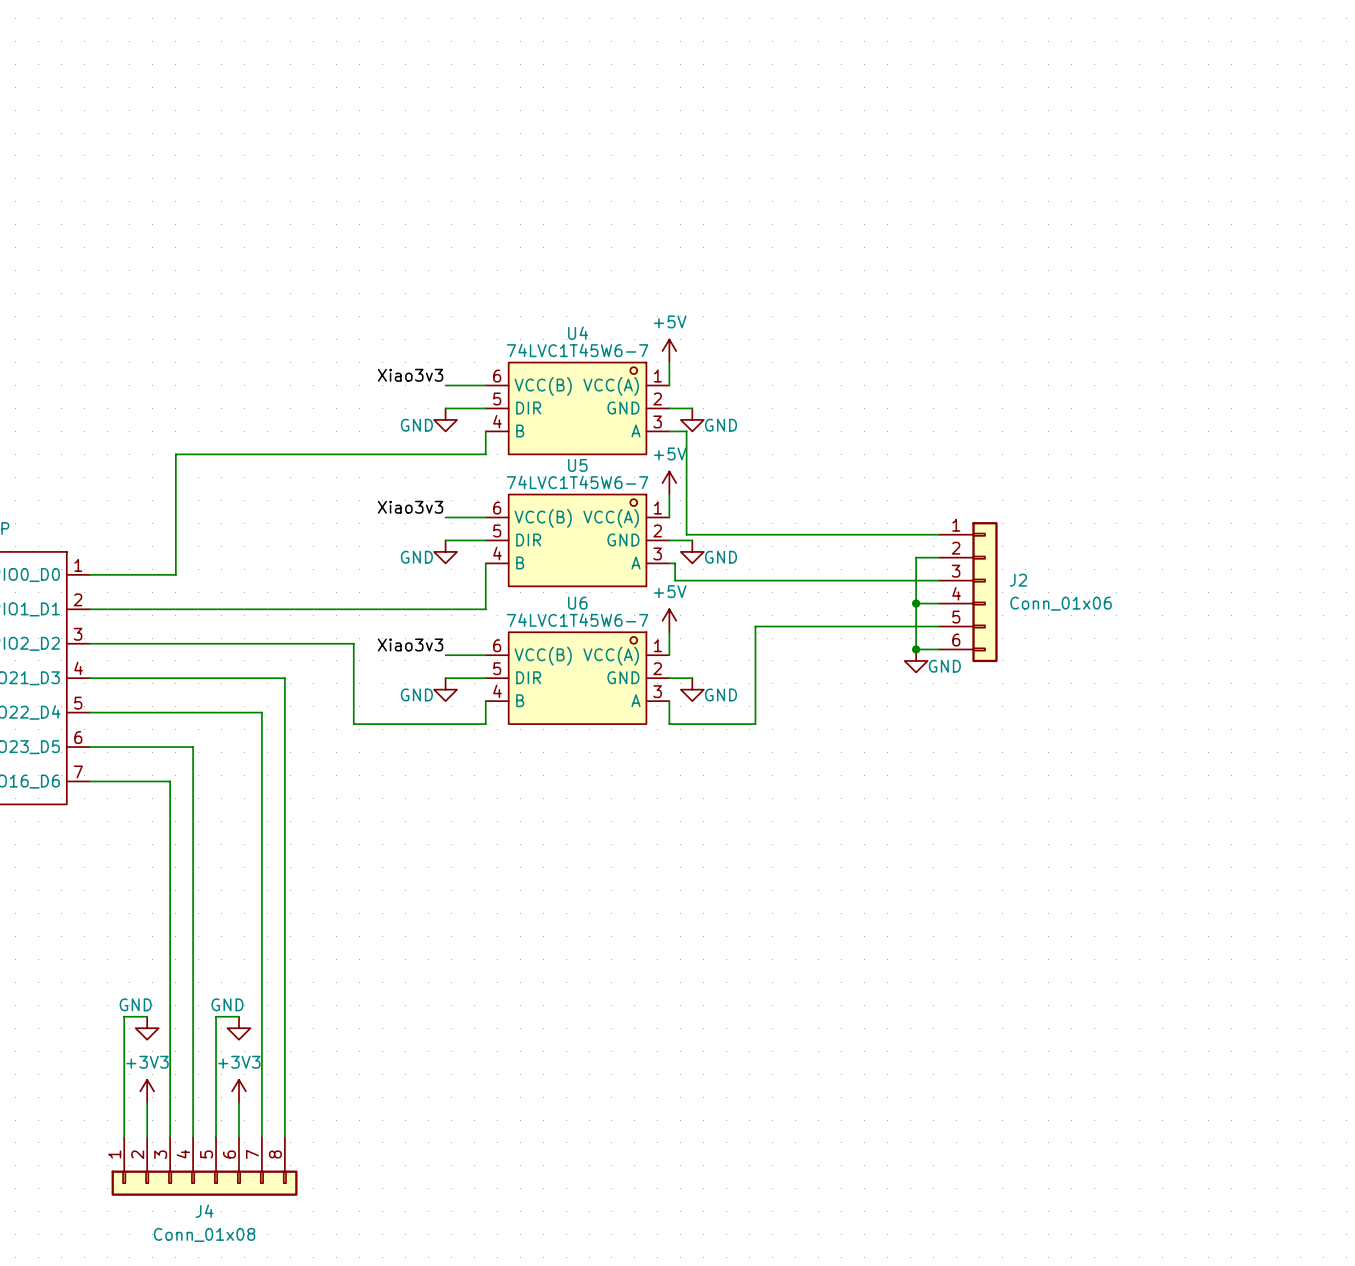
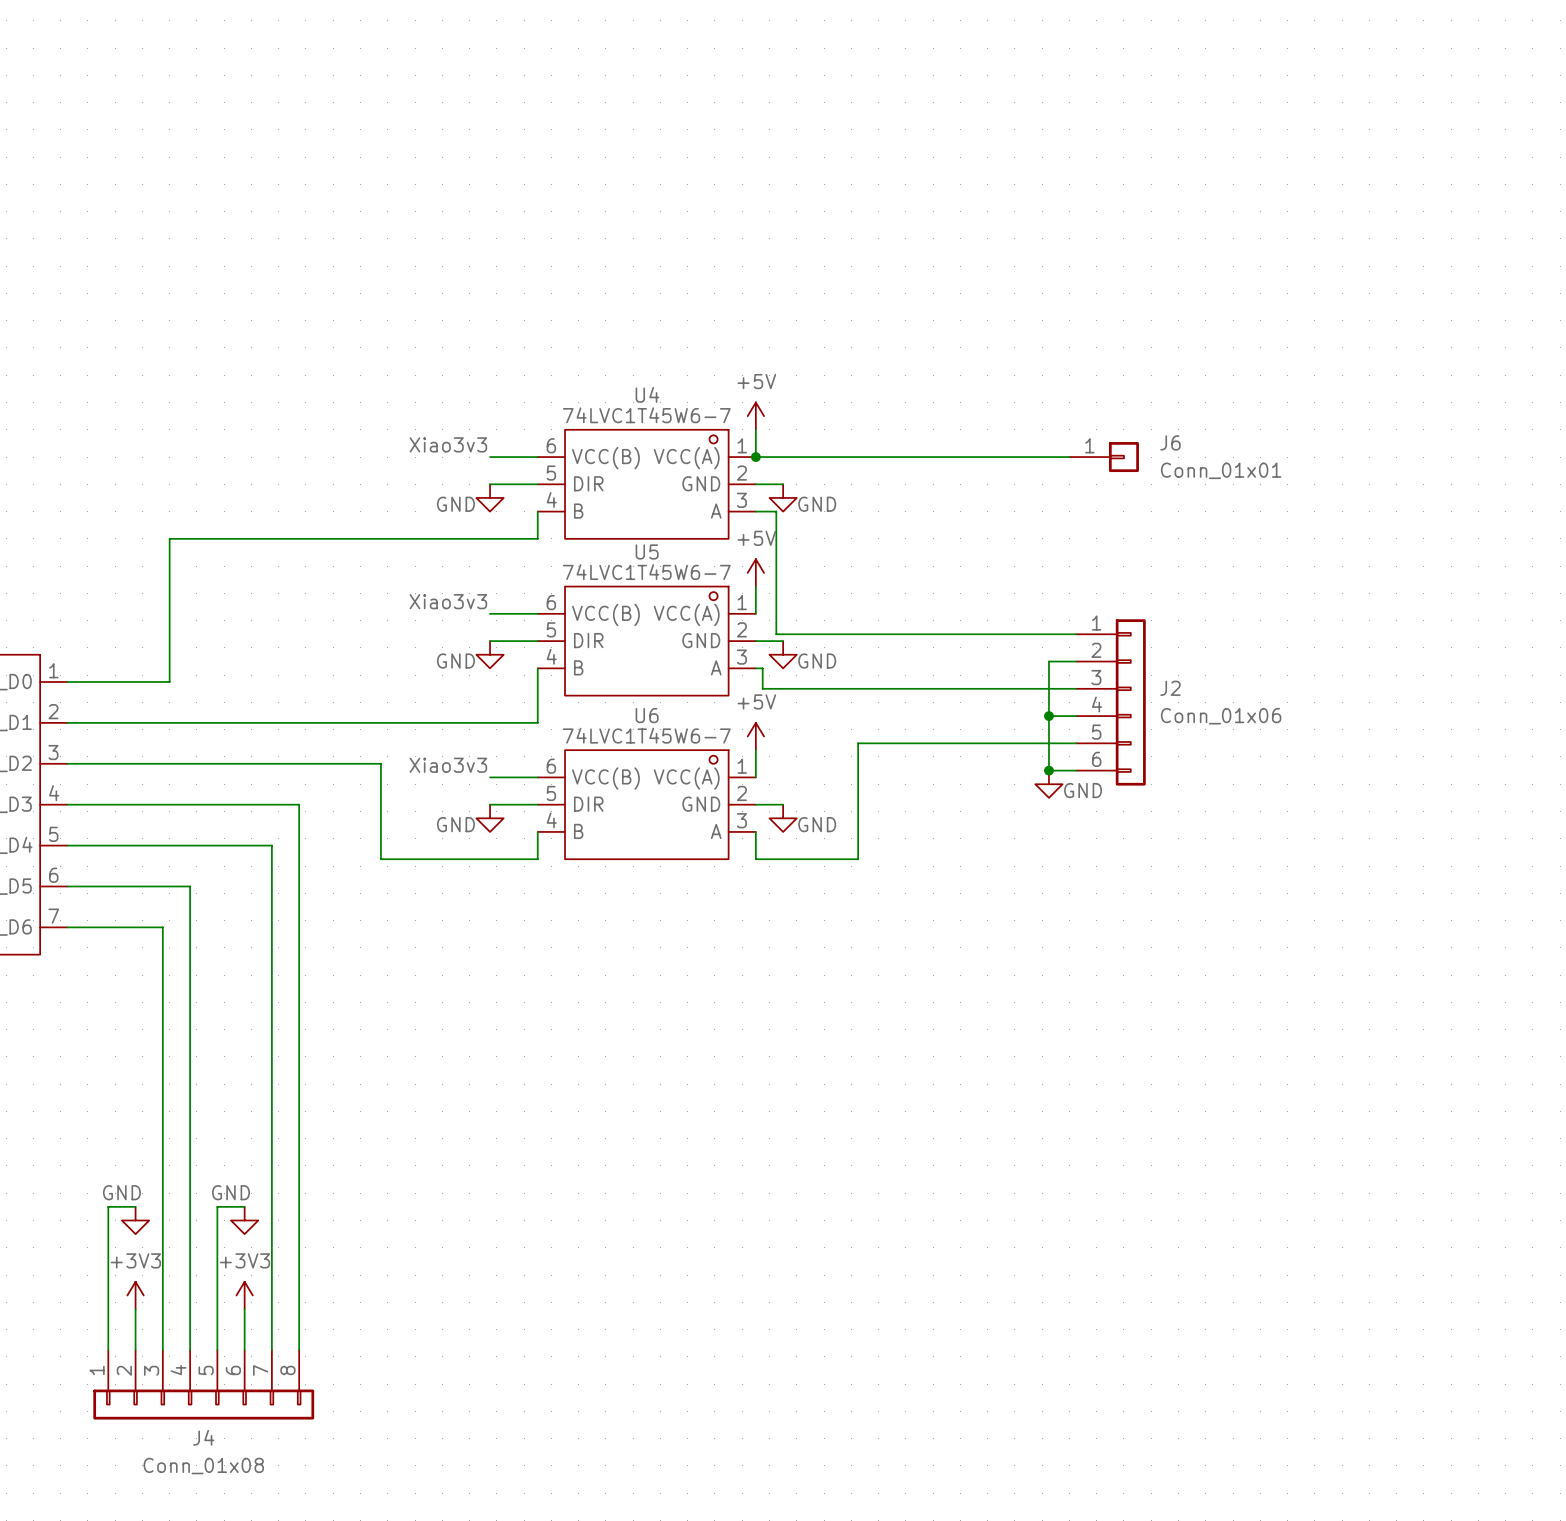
wire: none -> (755, 457) (1069, 457)
junction: none -> (755, 457)
J6: none -> Conn_01x01 (1104, 457)

